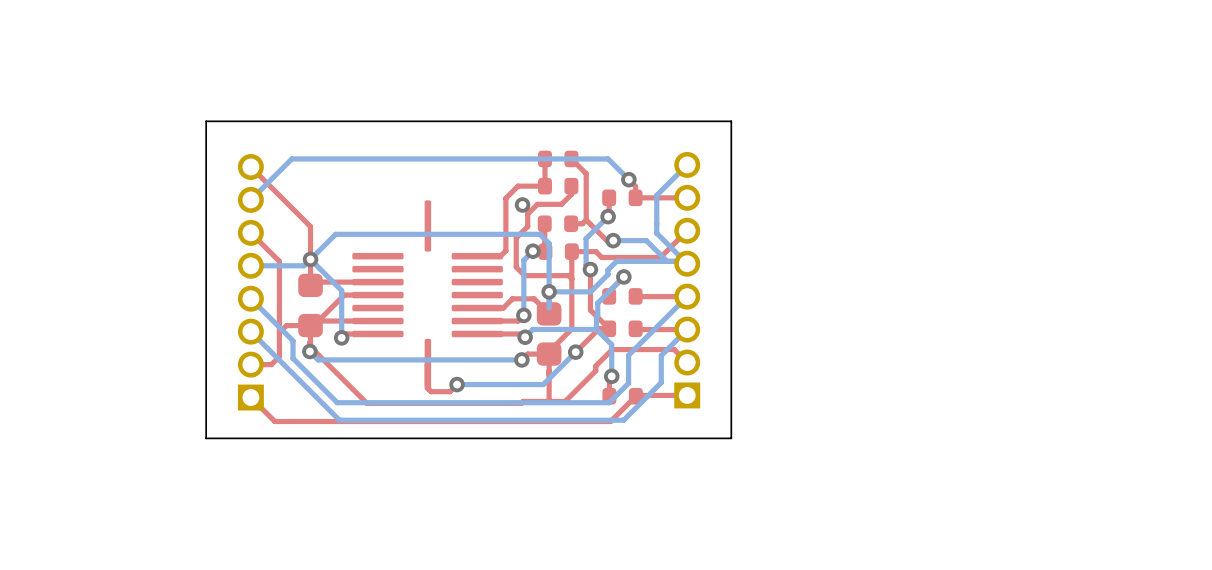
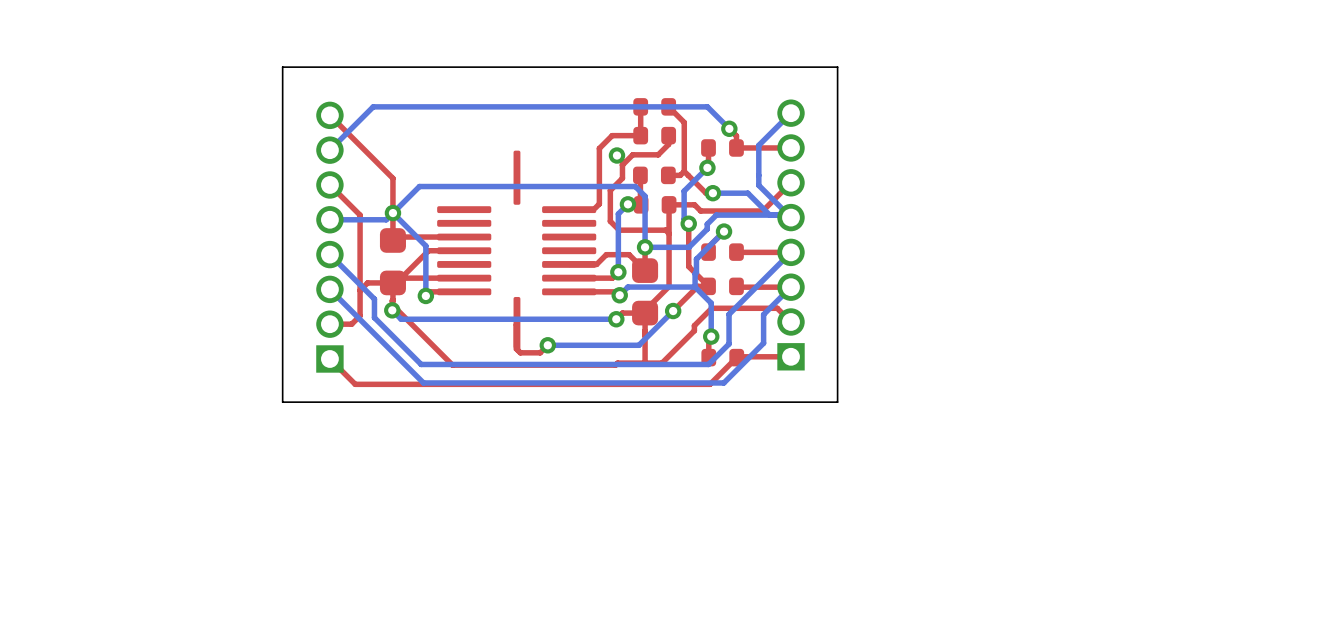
bottom track: (549, 291) (549, 308) -> none

